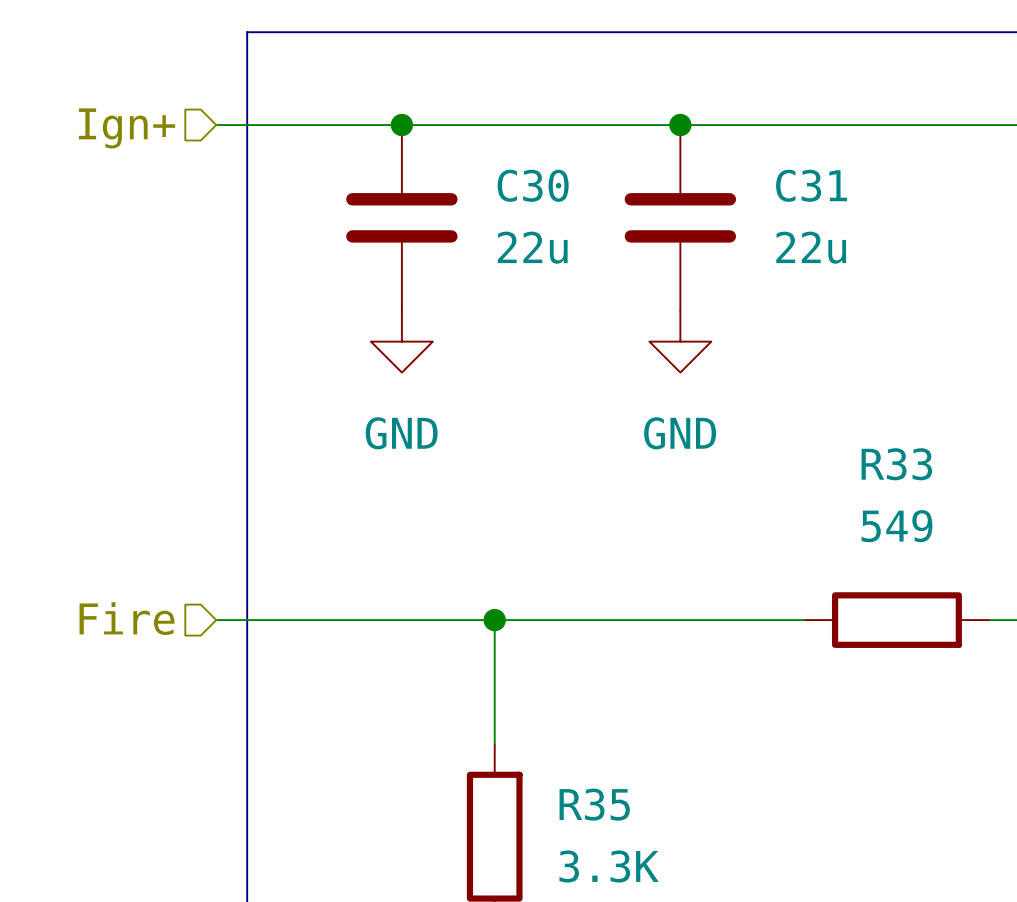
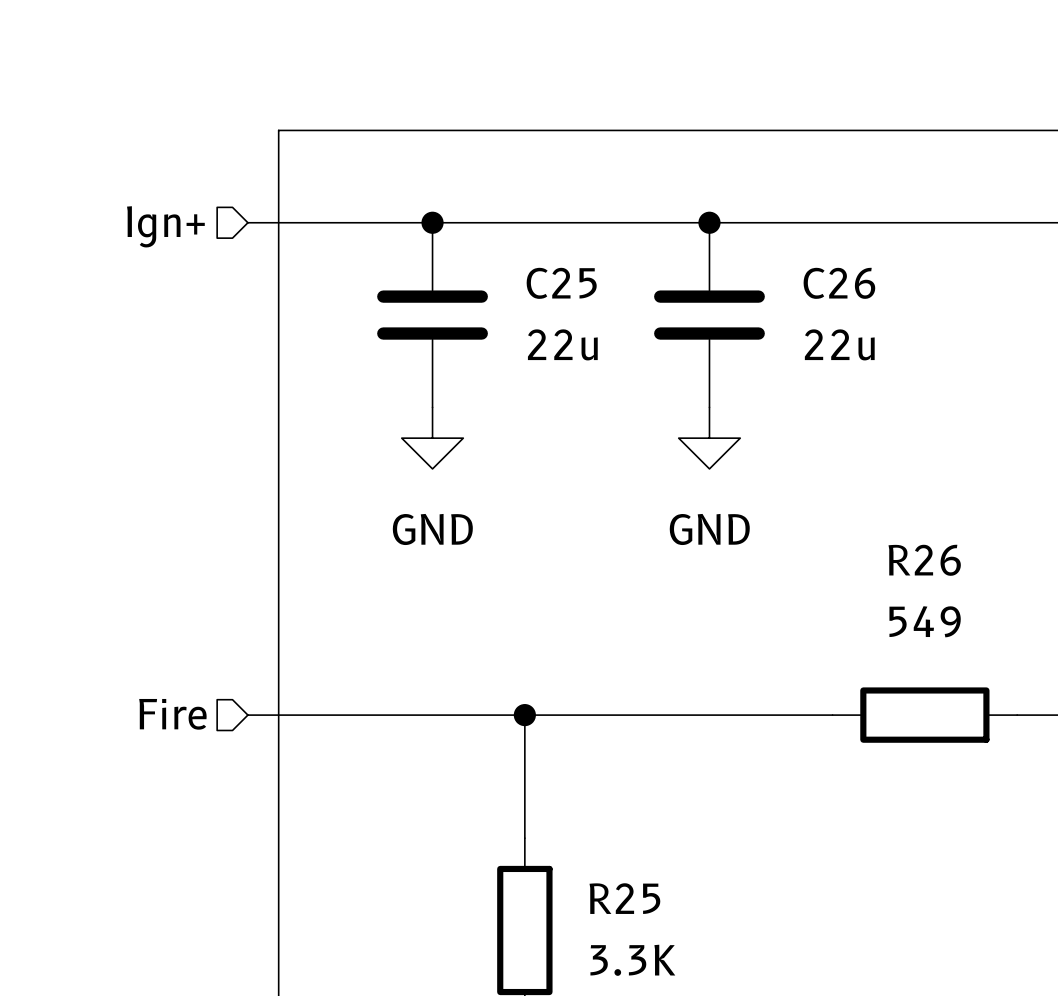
C30 name: C30 (533, 185) -> C25 (561, 283)
C31 name: C31 (811, 185) -> C26 (839, 283)
R33 name: R33 (896, 464) -> R26 (924, 560)
R35 name: R35 (594, 804) -> R25 (624, 898)

